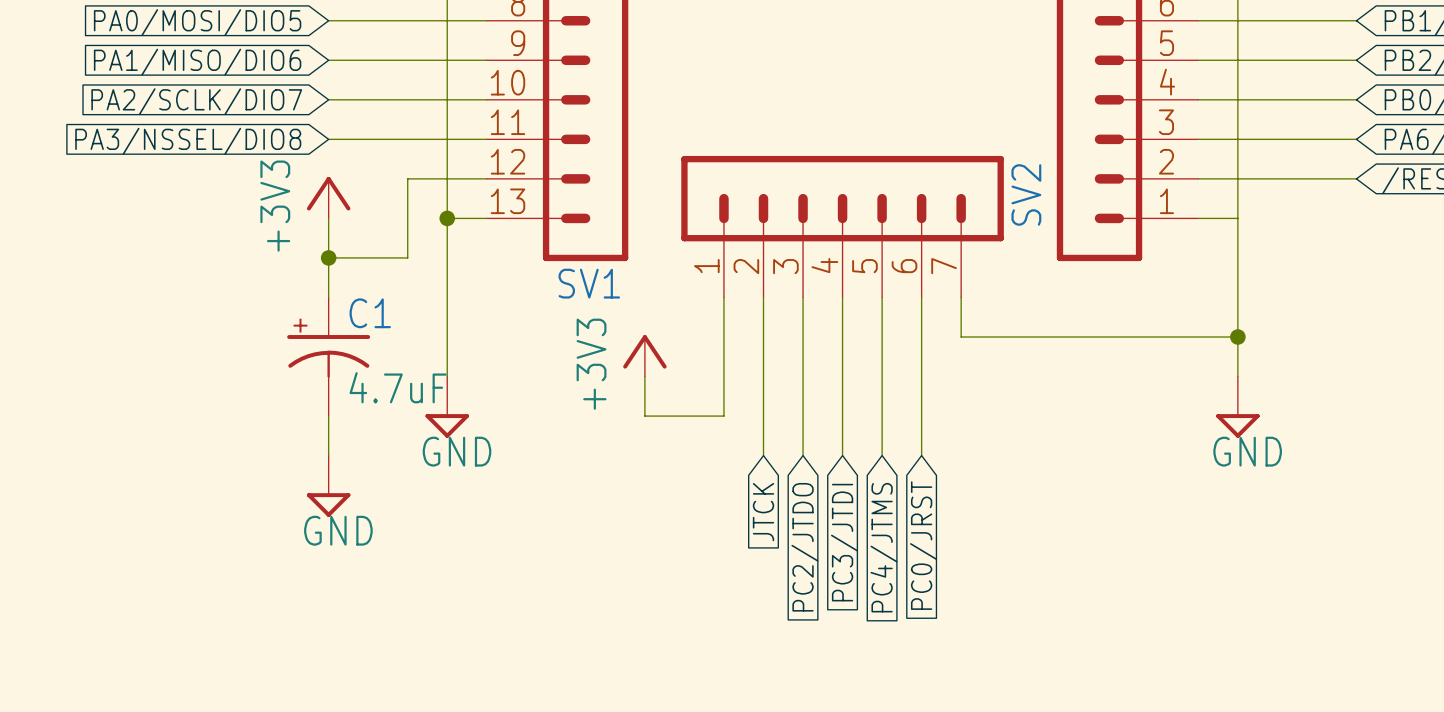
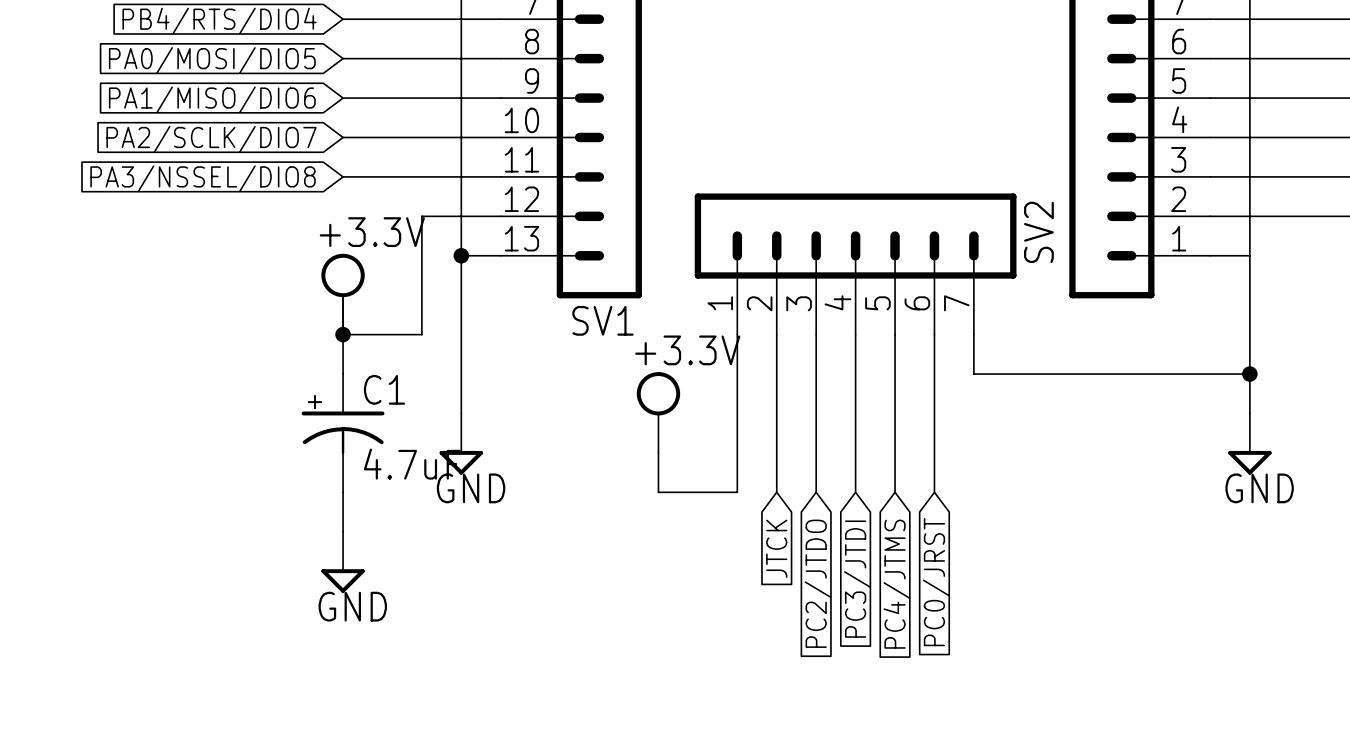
power symbol: +3V3 (328, 197) -> none
wire: (328, 218) (328, 257) (407, 257) -> (343, 374) (343, 334) (421, 334) (421, 295)
power symbol: none -> +3.3V (343, 294)
junction position: (328, 257) -> (343, 334)
power symbol: +3V3 (644, 355) -> none
C1 position: (328, 356) -> (343, 433)
power symbol: none -> +3.3V (658, 412)
wire: (644, 376) (644, 416) (723, 416) -> (658, 452) (658, 492) (737, 492) (737, 452)
power symbol position: GND (328, 486) -> GND (343, 562)

